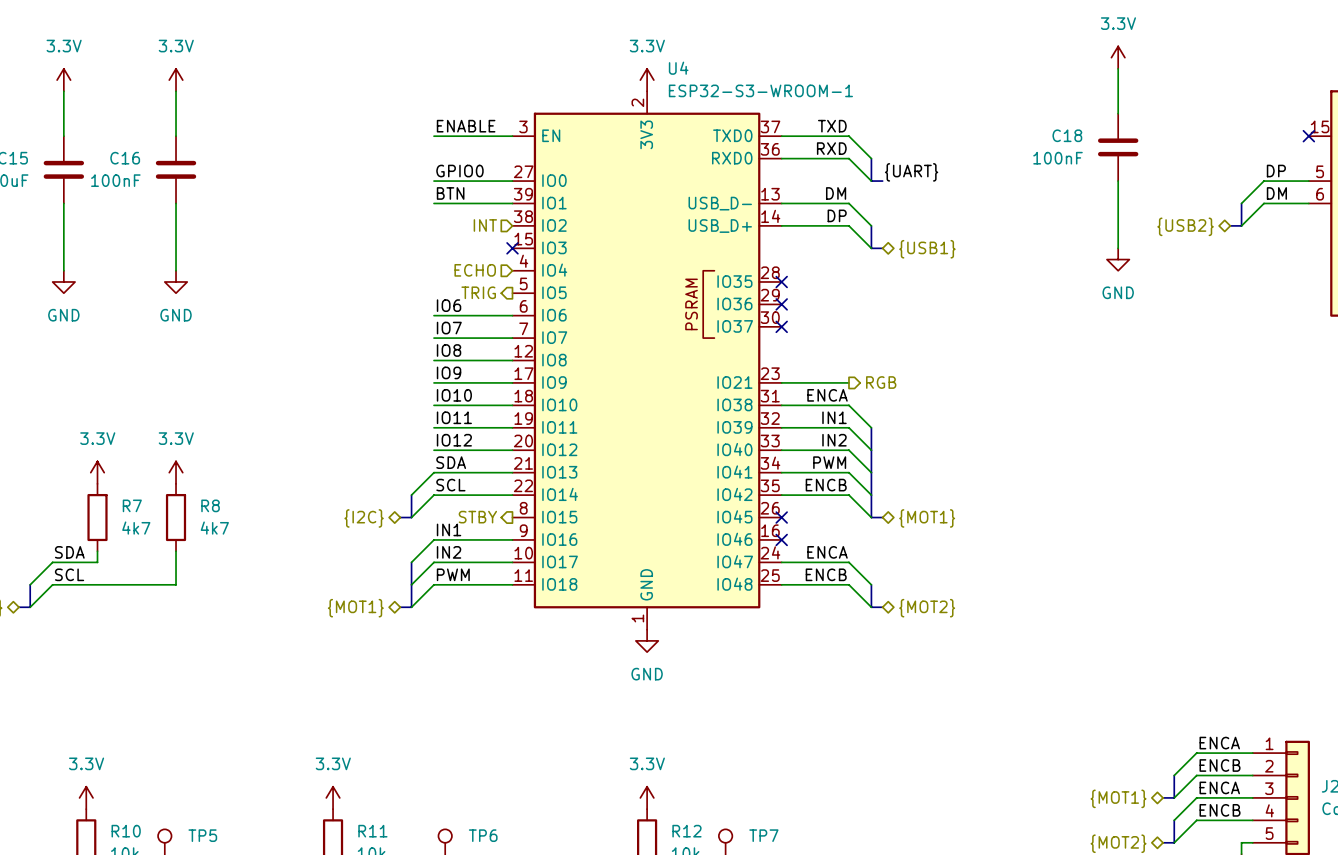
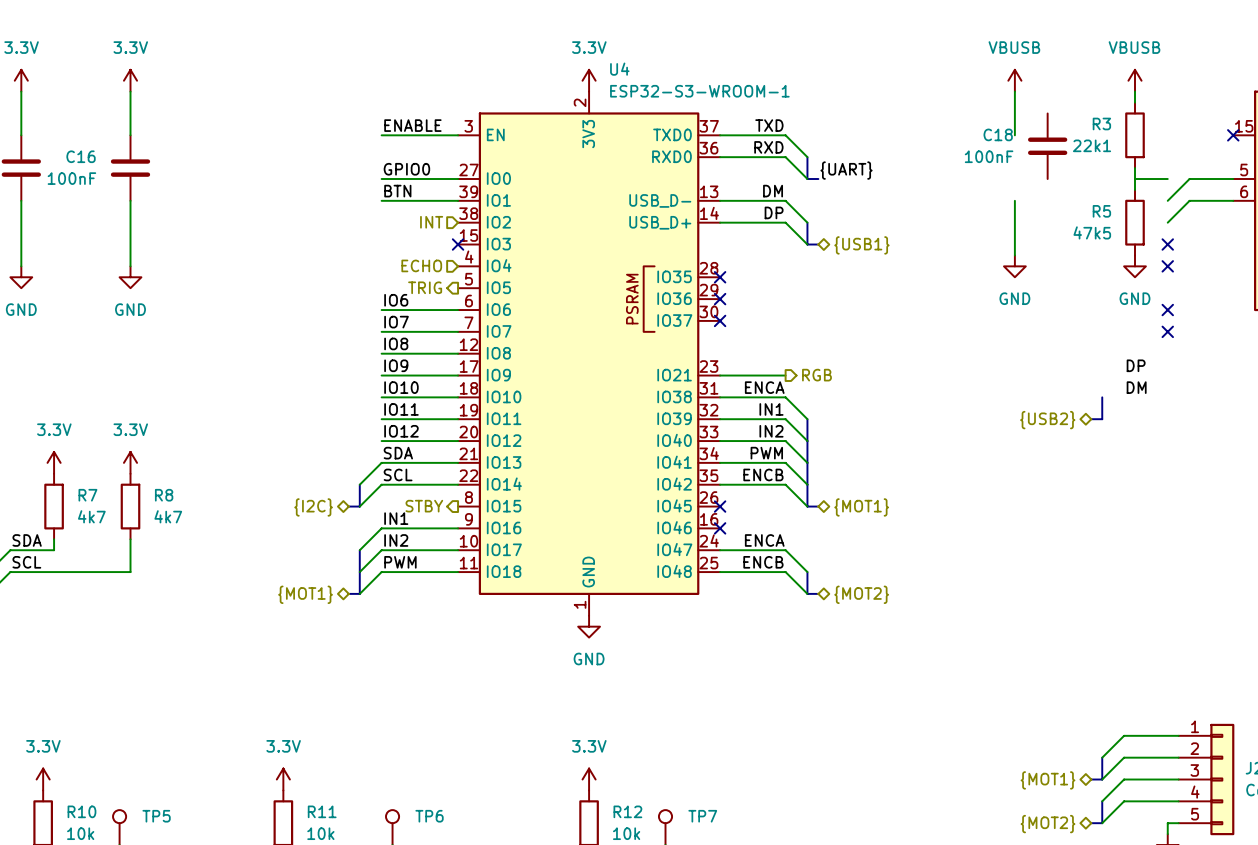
power symbol: 3.3V (1118, 57) -> none
wire: (1118, 68) (1118, 113) -> (1014, 91) (1014, 135)
power symbol: none -> VBUSB (1014, 80)
power symbol: none -> VBUSB (1135, 80)
wire: none -> (1135, 91) (1135, 102)
R3: none -> 22k1 (1135, 135)
wire: none -> (1135, 168) (1135, 189)
label position: DP (1276, 171) -> DP (1136, 365)
wire: (1118, 181) (1118, 248) -> none
wire: none -> (1135, 179) (1167, 179)
label position: DM (1276, 193) -> DM (1136, 387)
wire: none -> (1014, 200) (1014, 255)
bus: (1241, 203) (1241, 225) (1230, 225) -> (1102, 397) (1102, 419) (1091, 419)
R5: none -> 47k5 (1135, 222)
hierarchical label position: {USB2} (1185, 226) -> {USB2} (1047, 420)
no-connect mark: none -> (1167, 244)
power symbol position: GND (1118, 259) -> GND (1014, 266)
power symbol: none -> GND (1135, 266)
no-connect mark: none -> (1167, 266)
no-connect mark: none -> (1167, 310)
no-connect mark: none -> (1167, 331)
label: ENCA (1219, 743) -> none
label: ENCB (1220, 765) -> none
label: ENCA (1219, 787) -> none
label: ENCB (1220, 810) -> none

